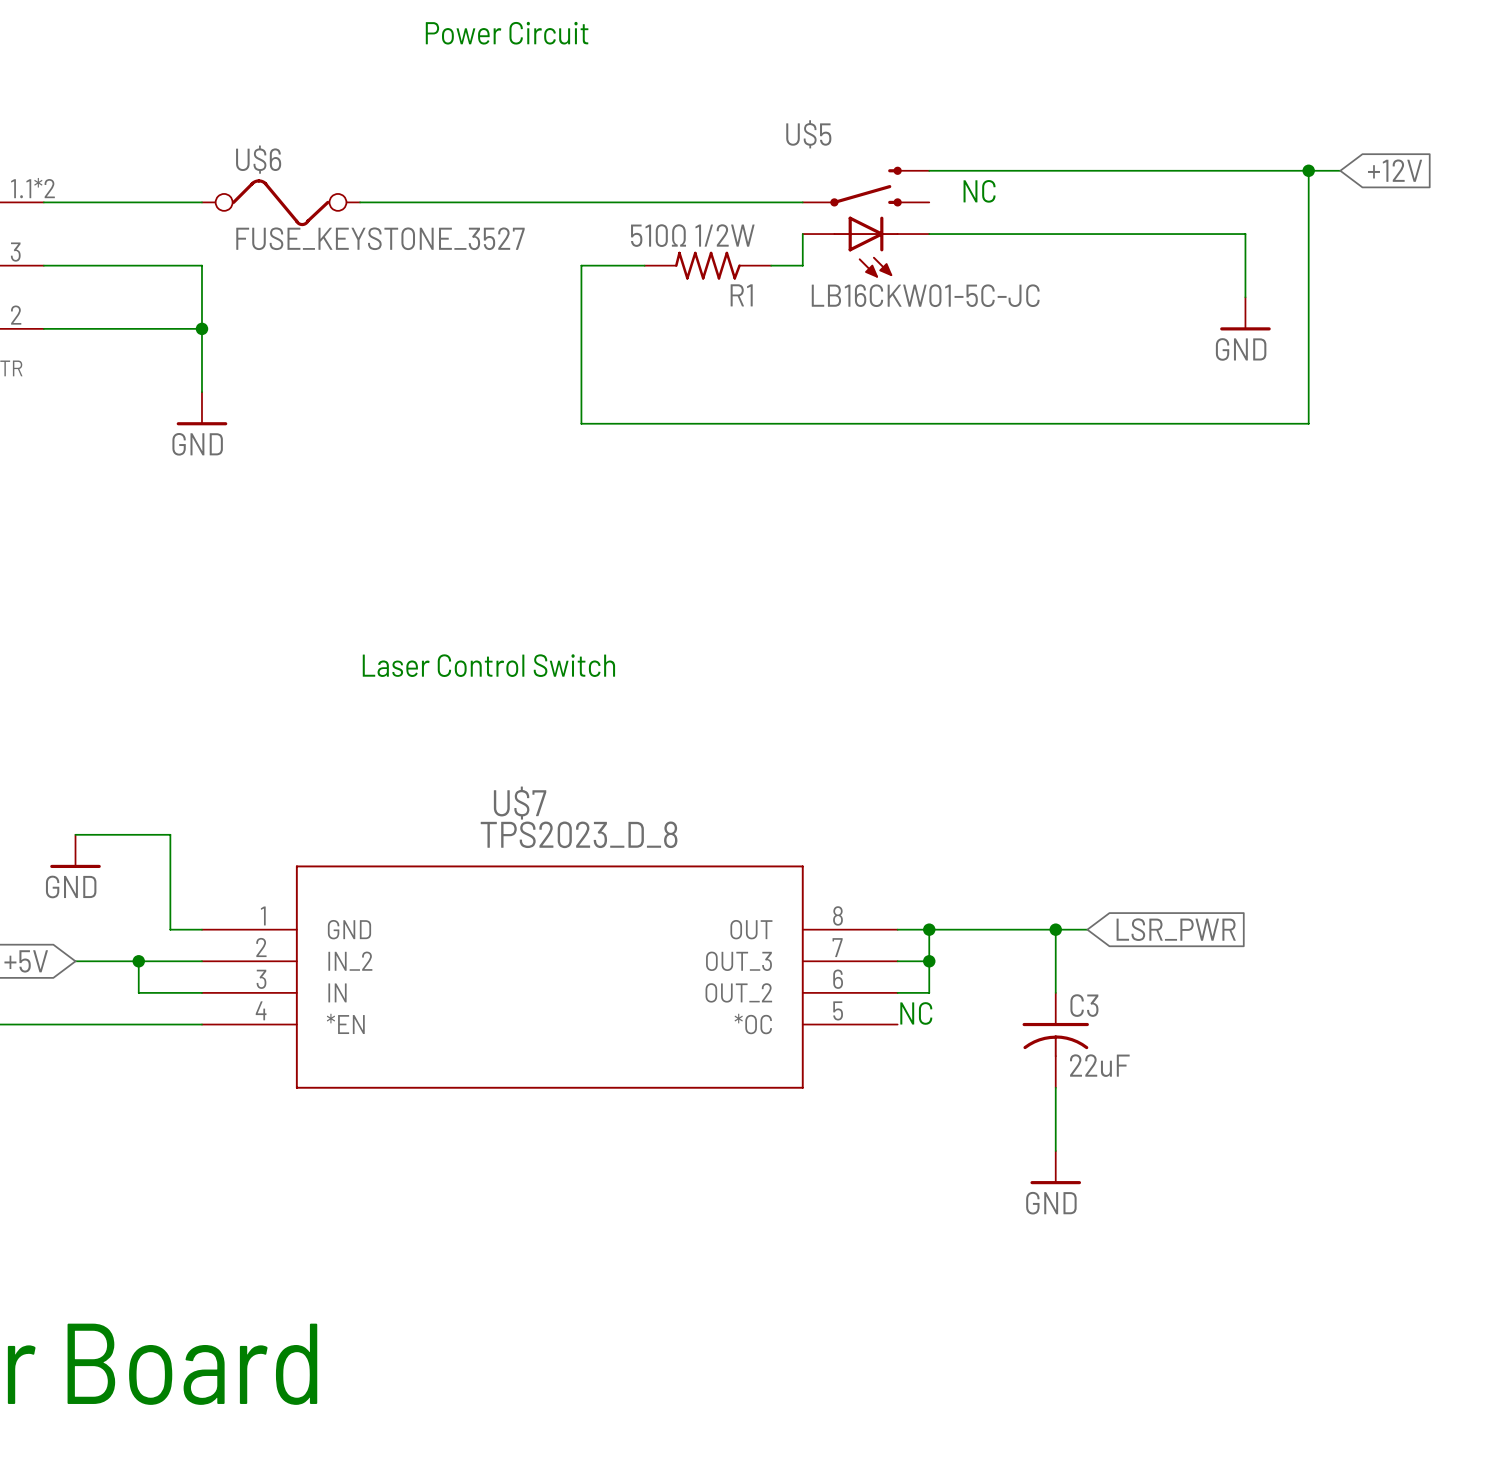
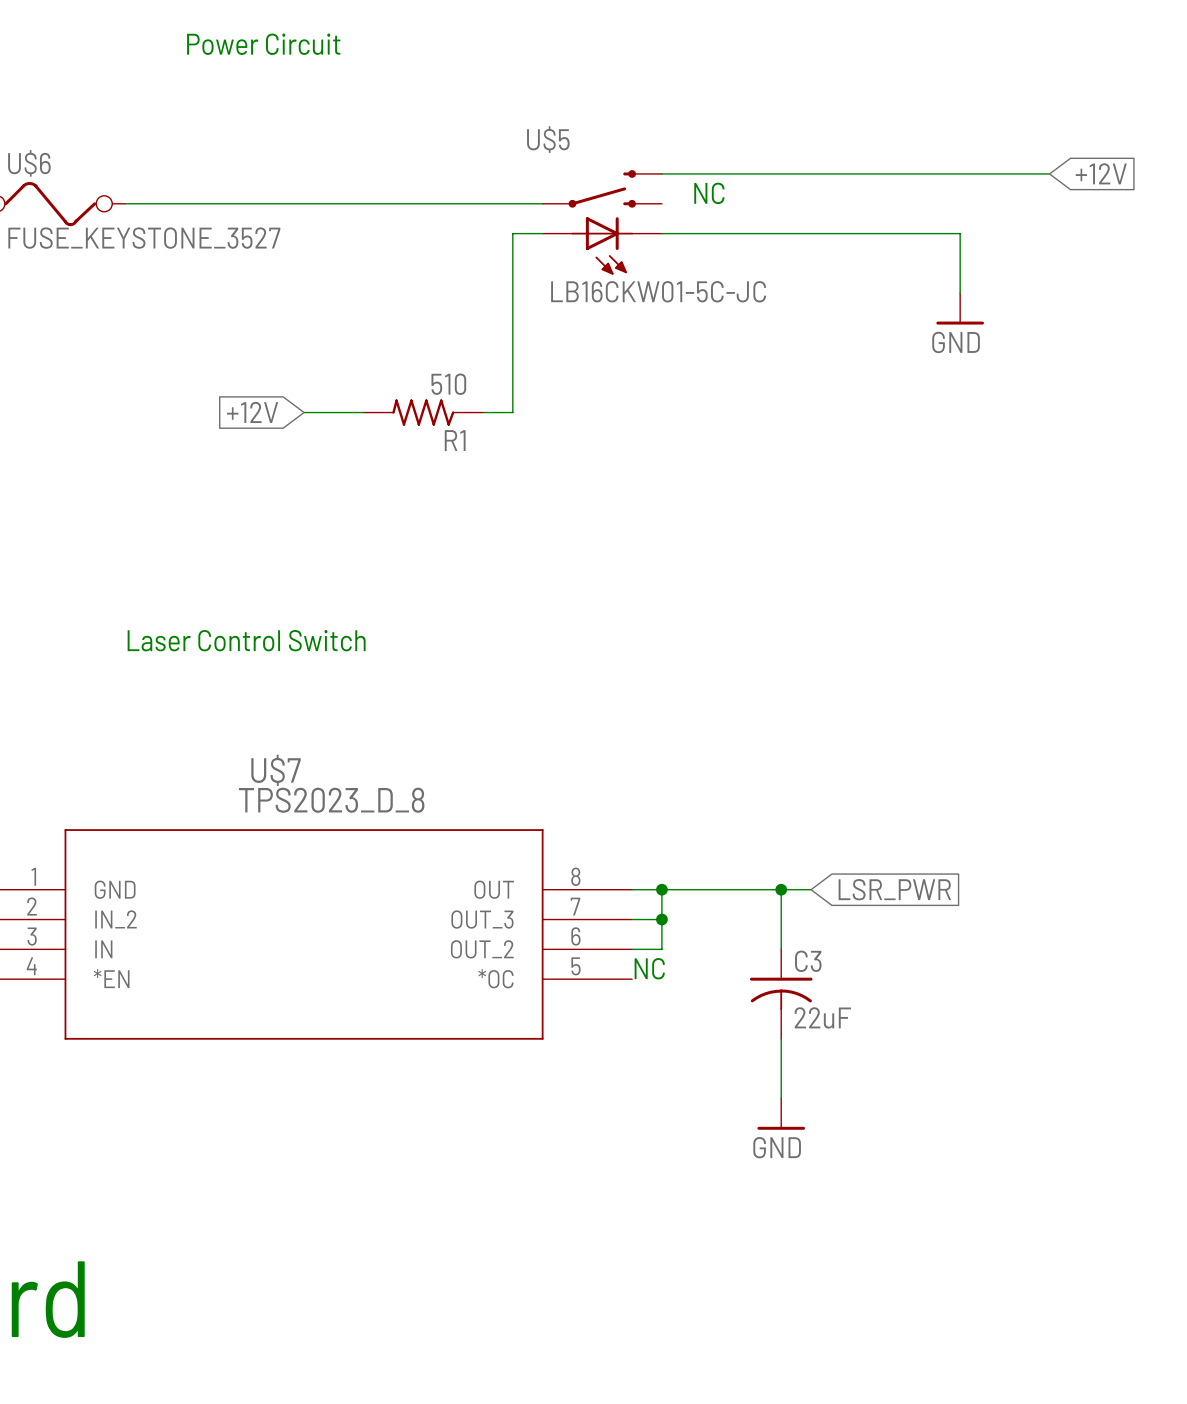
wire: (1308, 170) (1308, 423) (771, 423) -> none
junction: (1308, 170) -> none
wire: (802, 234) (802, 265) (771, 265) -> (542, 233) (512, 233) (512, 412)
R1 value: 510Ω 1/2W (692, 235) -> 510 (448, 384)
wire: (644, 265) (581, 265) (581, 423) -> (304, 412) (333, 412)
R1 position: (707, 265) -> (423, 412)
global label: none -> +12V (252, 412)

